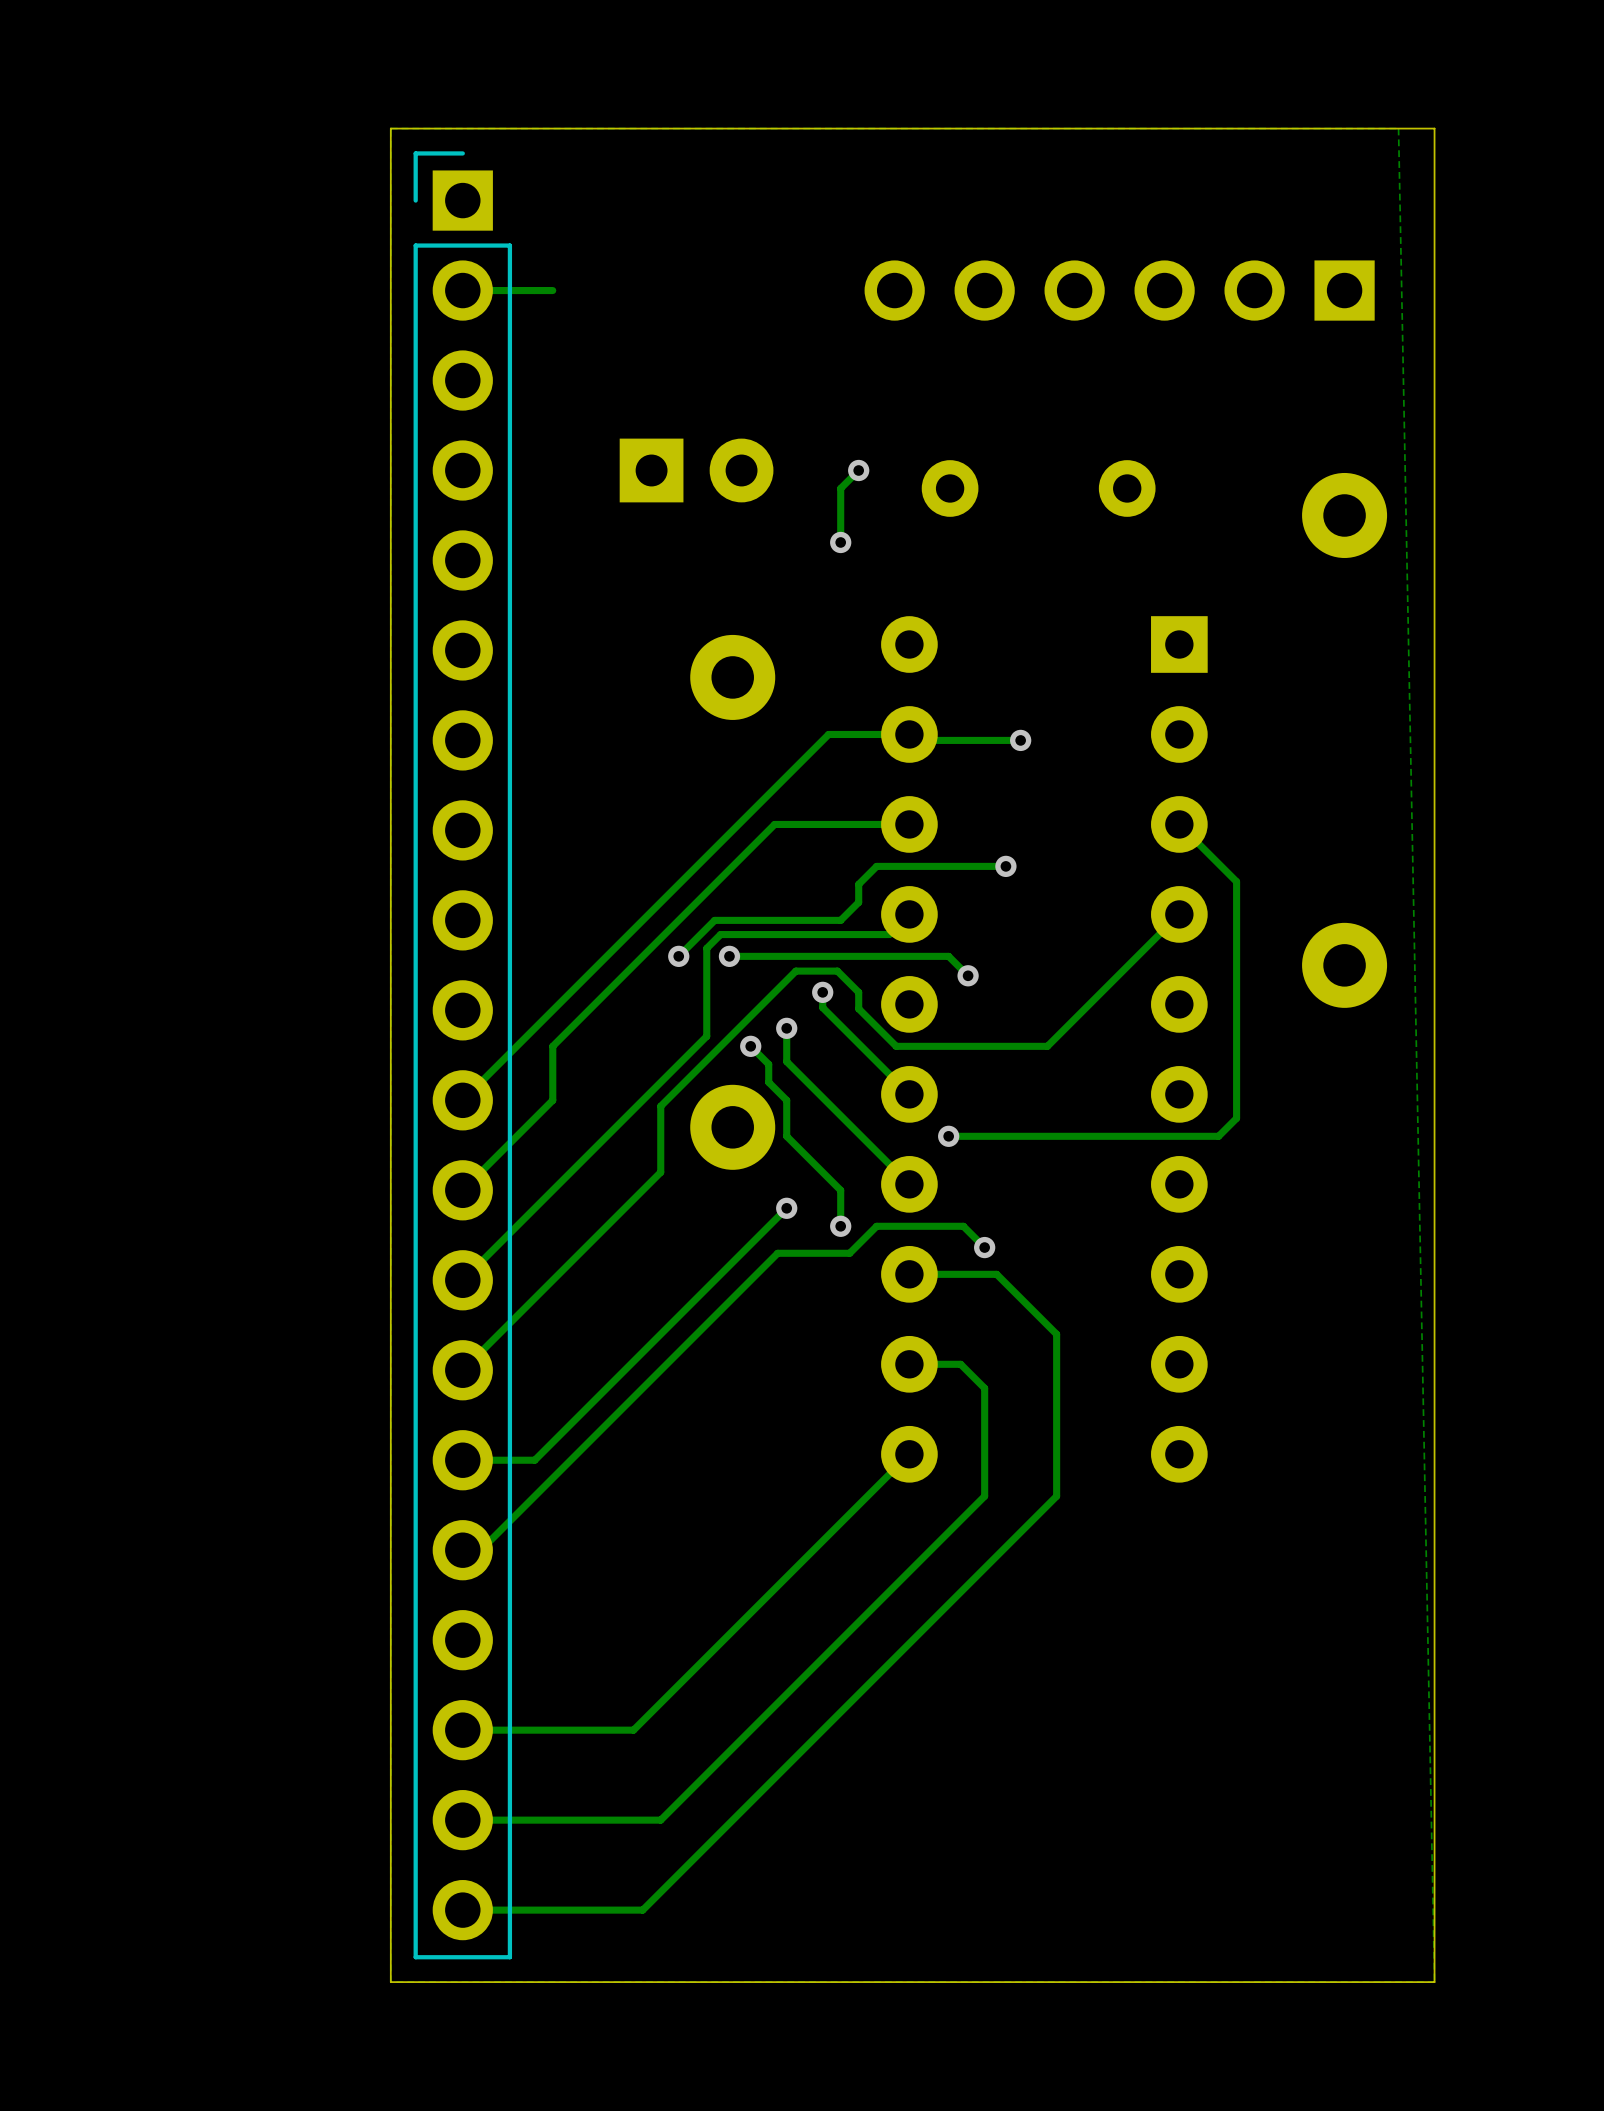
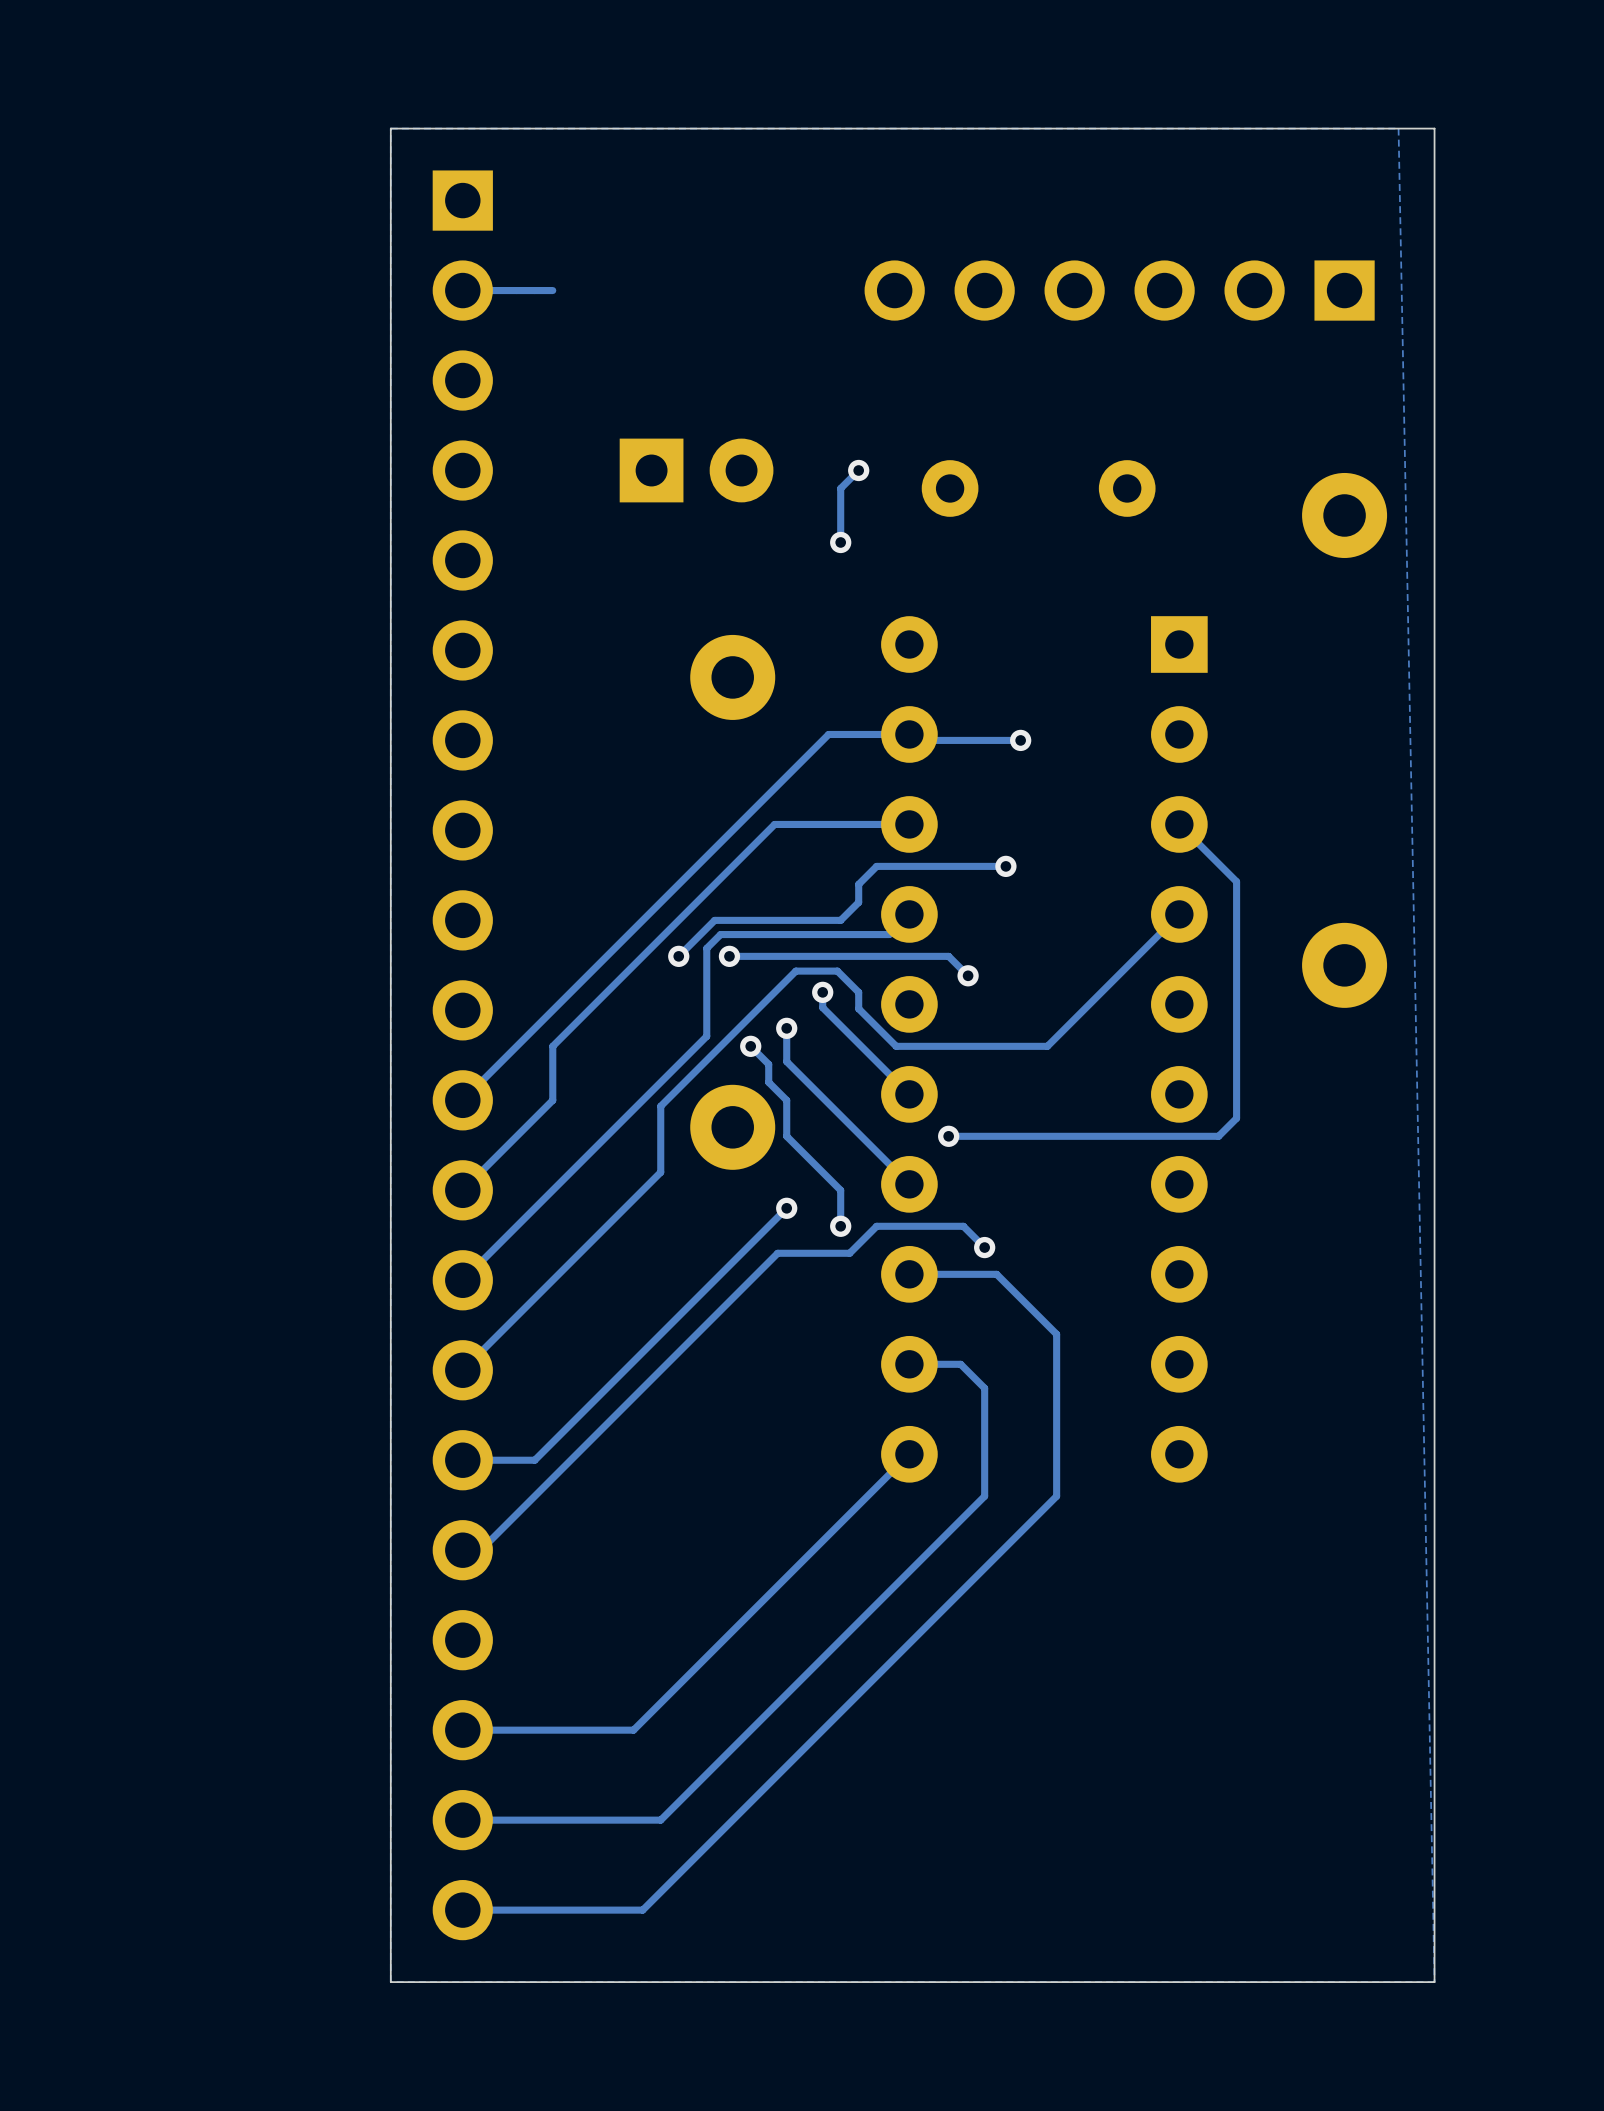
part side: bottom (462, 1055) -> top (462, 1055)

